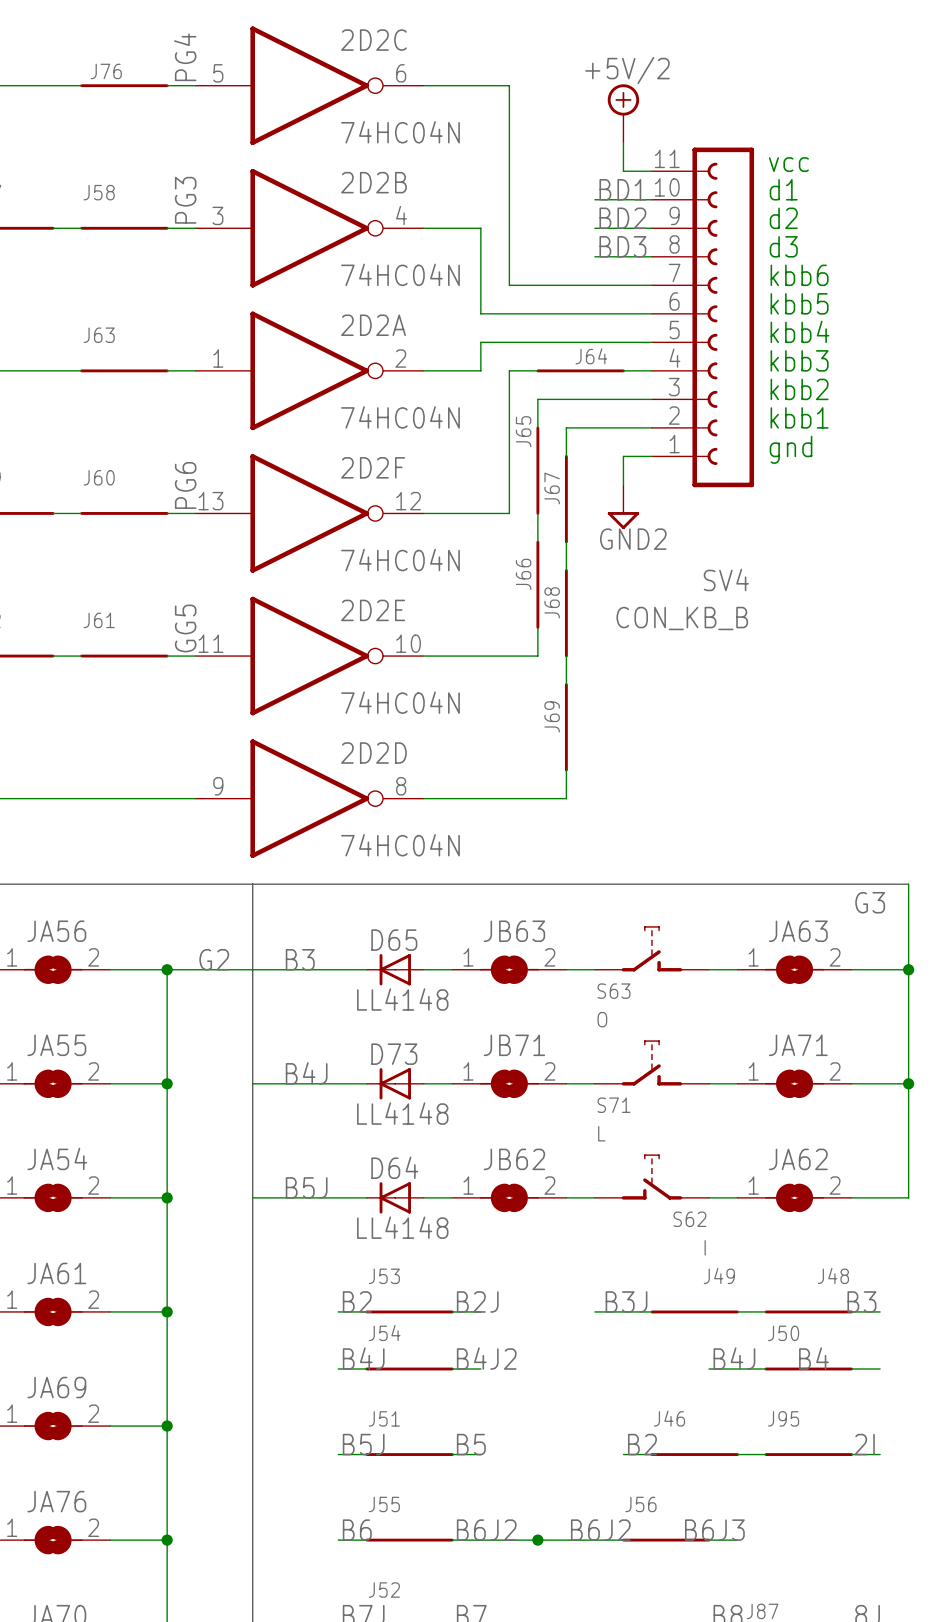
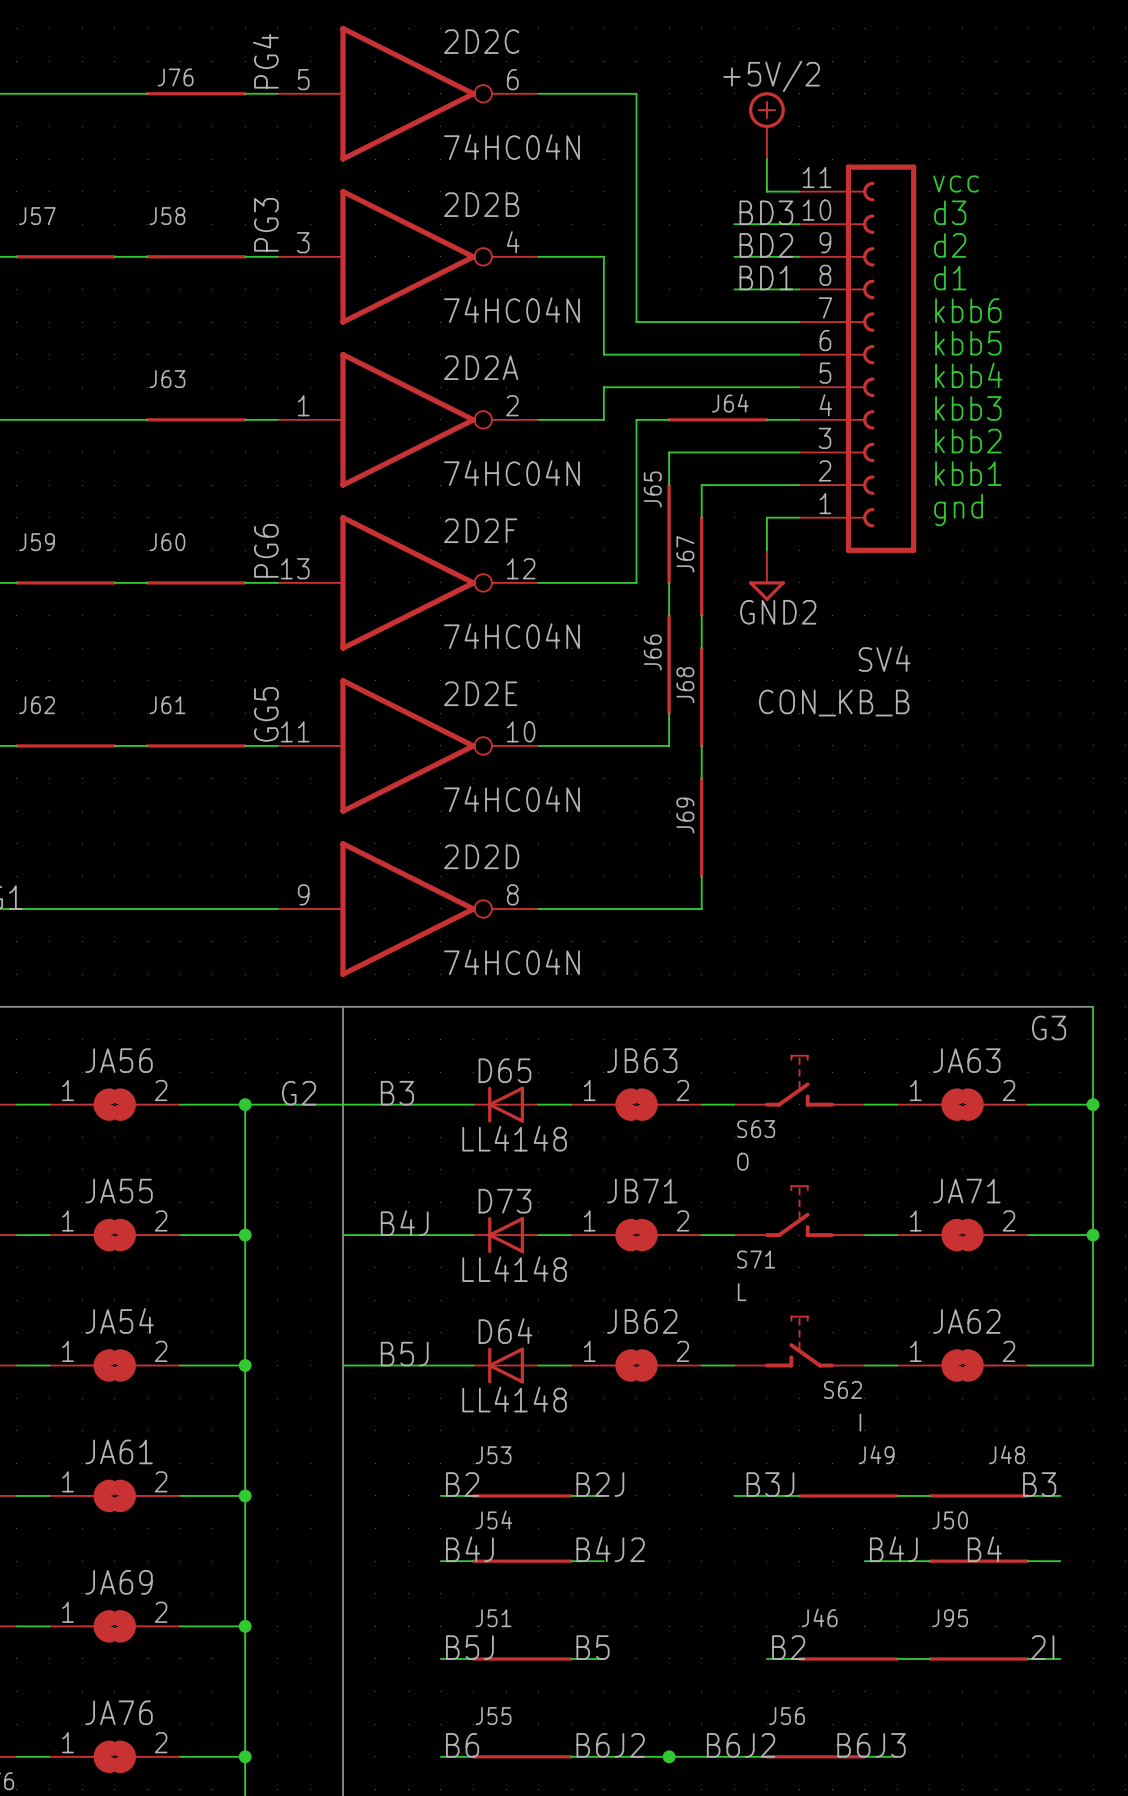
label: BD1 (622, 189) -> BD3 (766, 212)
text: d1 (783, 189) -> d3 (950, 212)
label: BD3 (622, 246) -> BD1 (766, 278)
text: d3 (783, 246) -> d1 (950, 278)

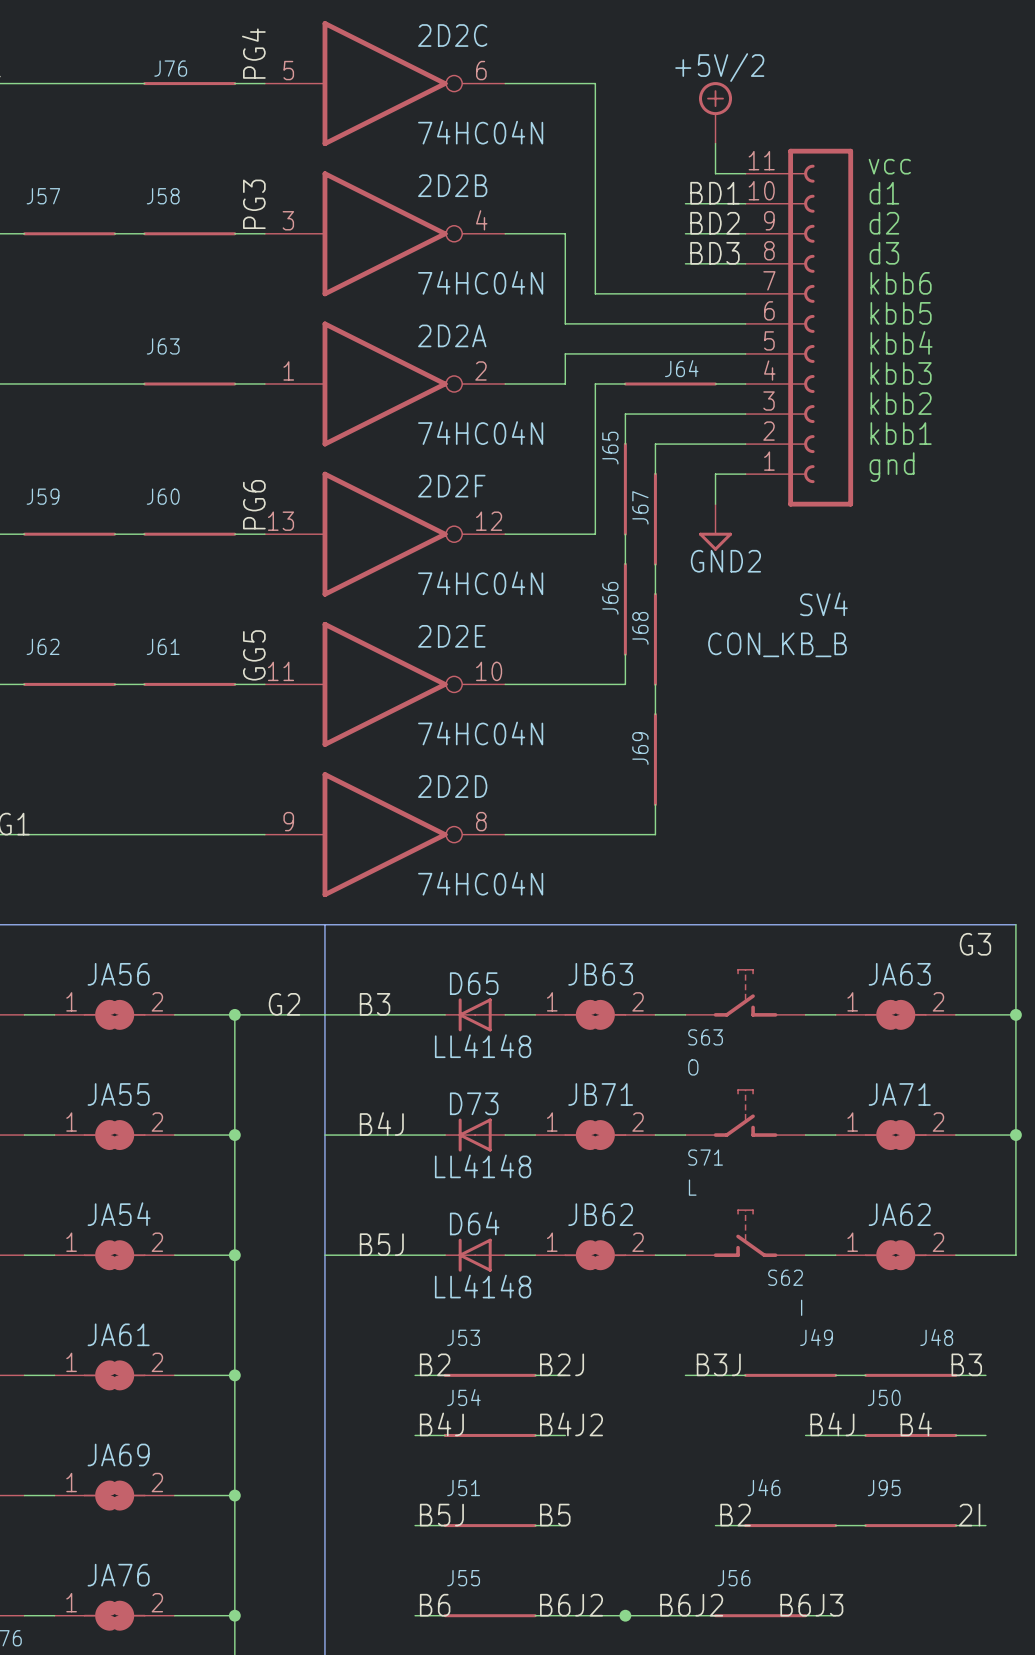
label: BD3 (766, 212) -> BD1 (714, 193)
text: d3 (950, 212) -> d1 (884, 193)
label: BD1 (766, 278) -> BD3 (714, 253)
text: d1 (950, 278) -> d3 (884, 253)

